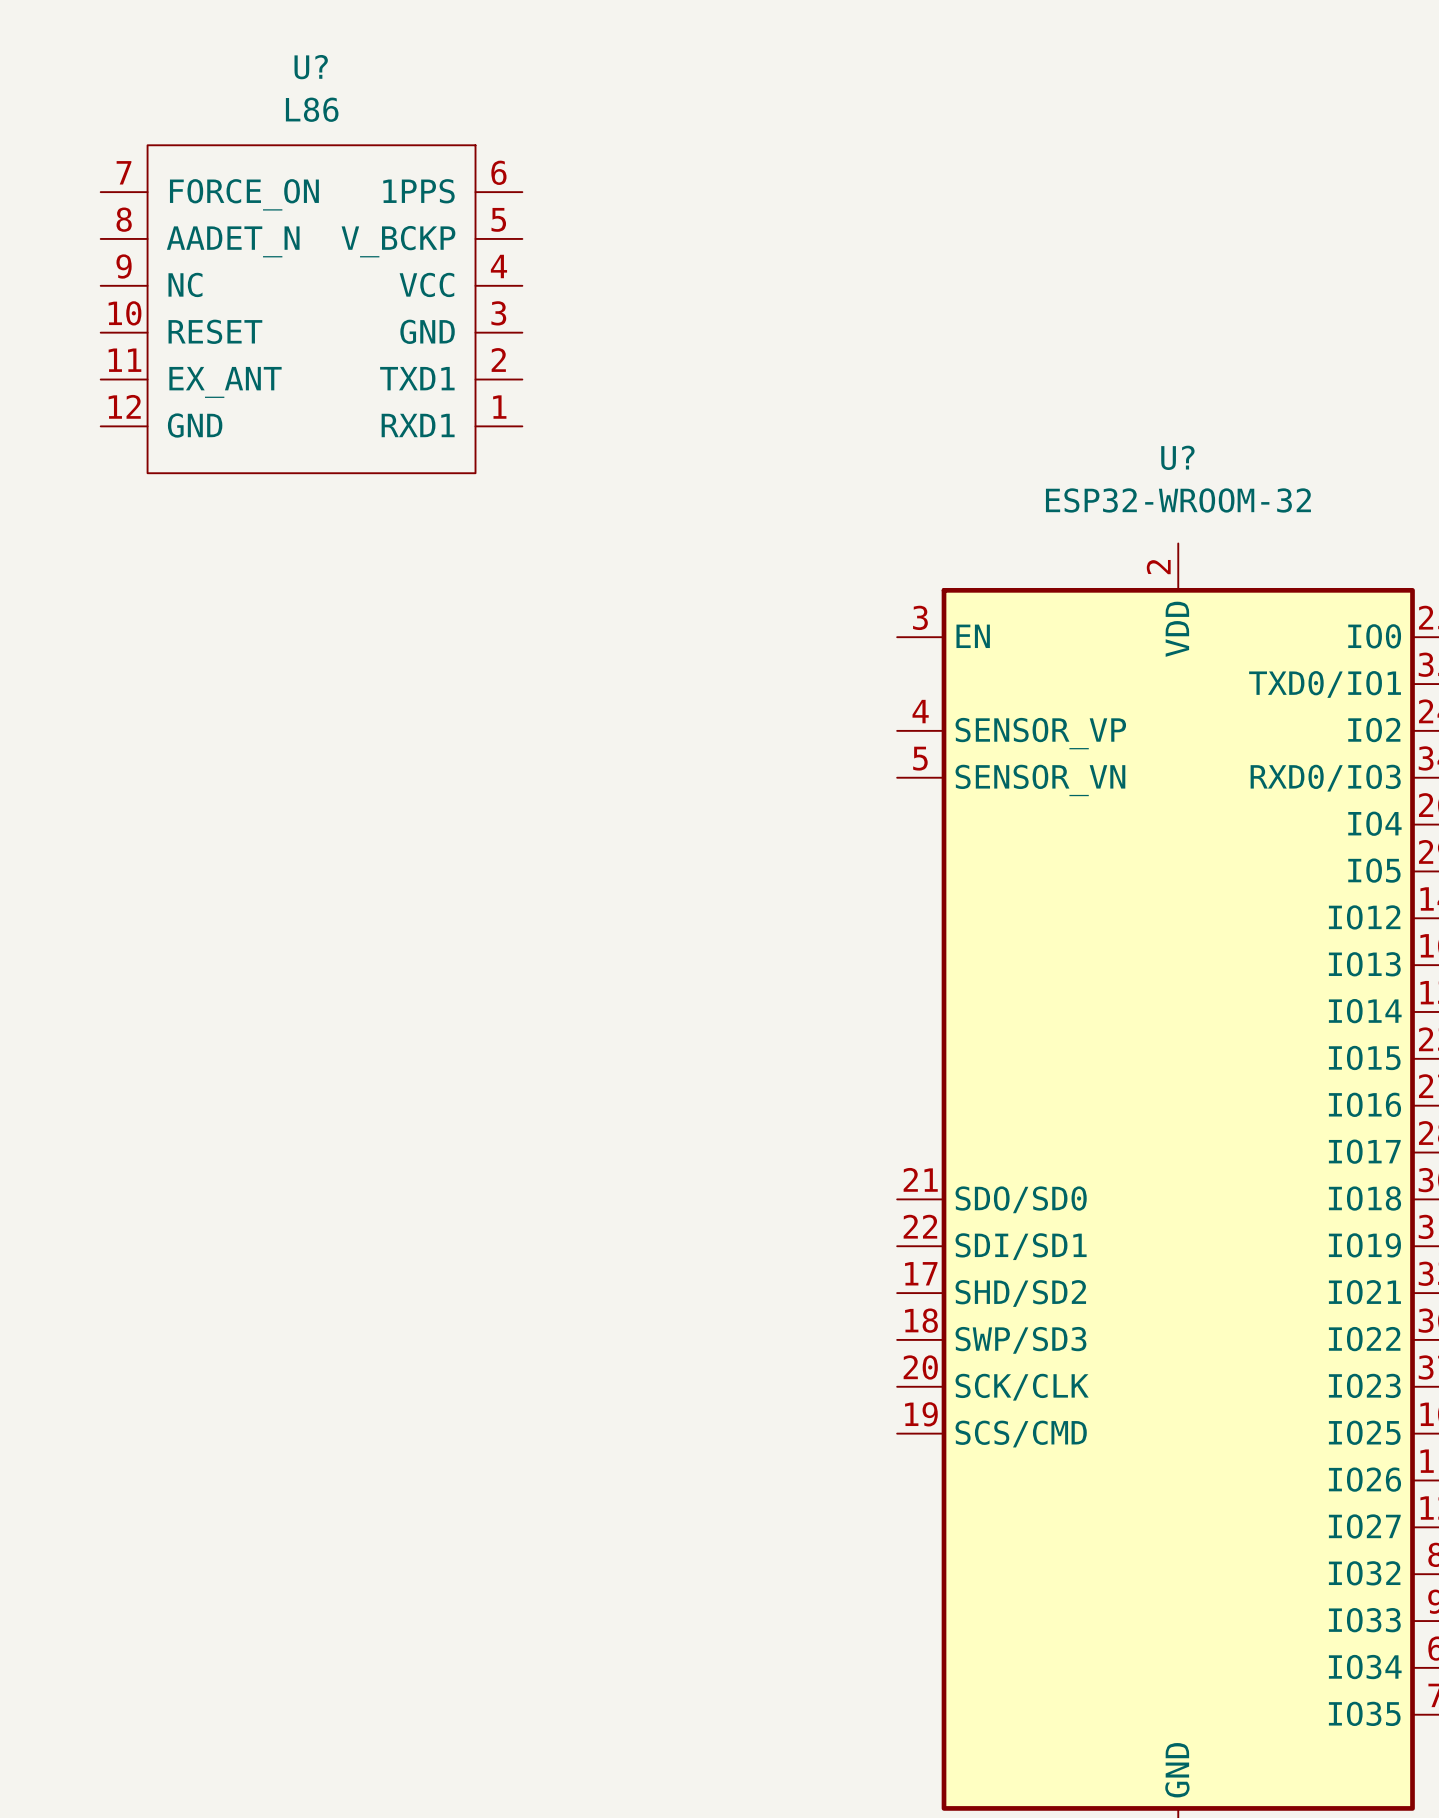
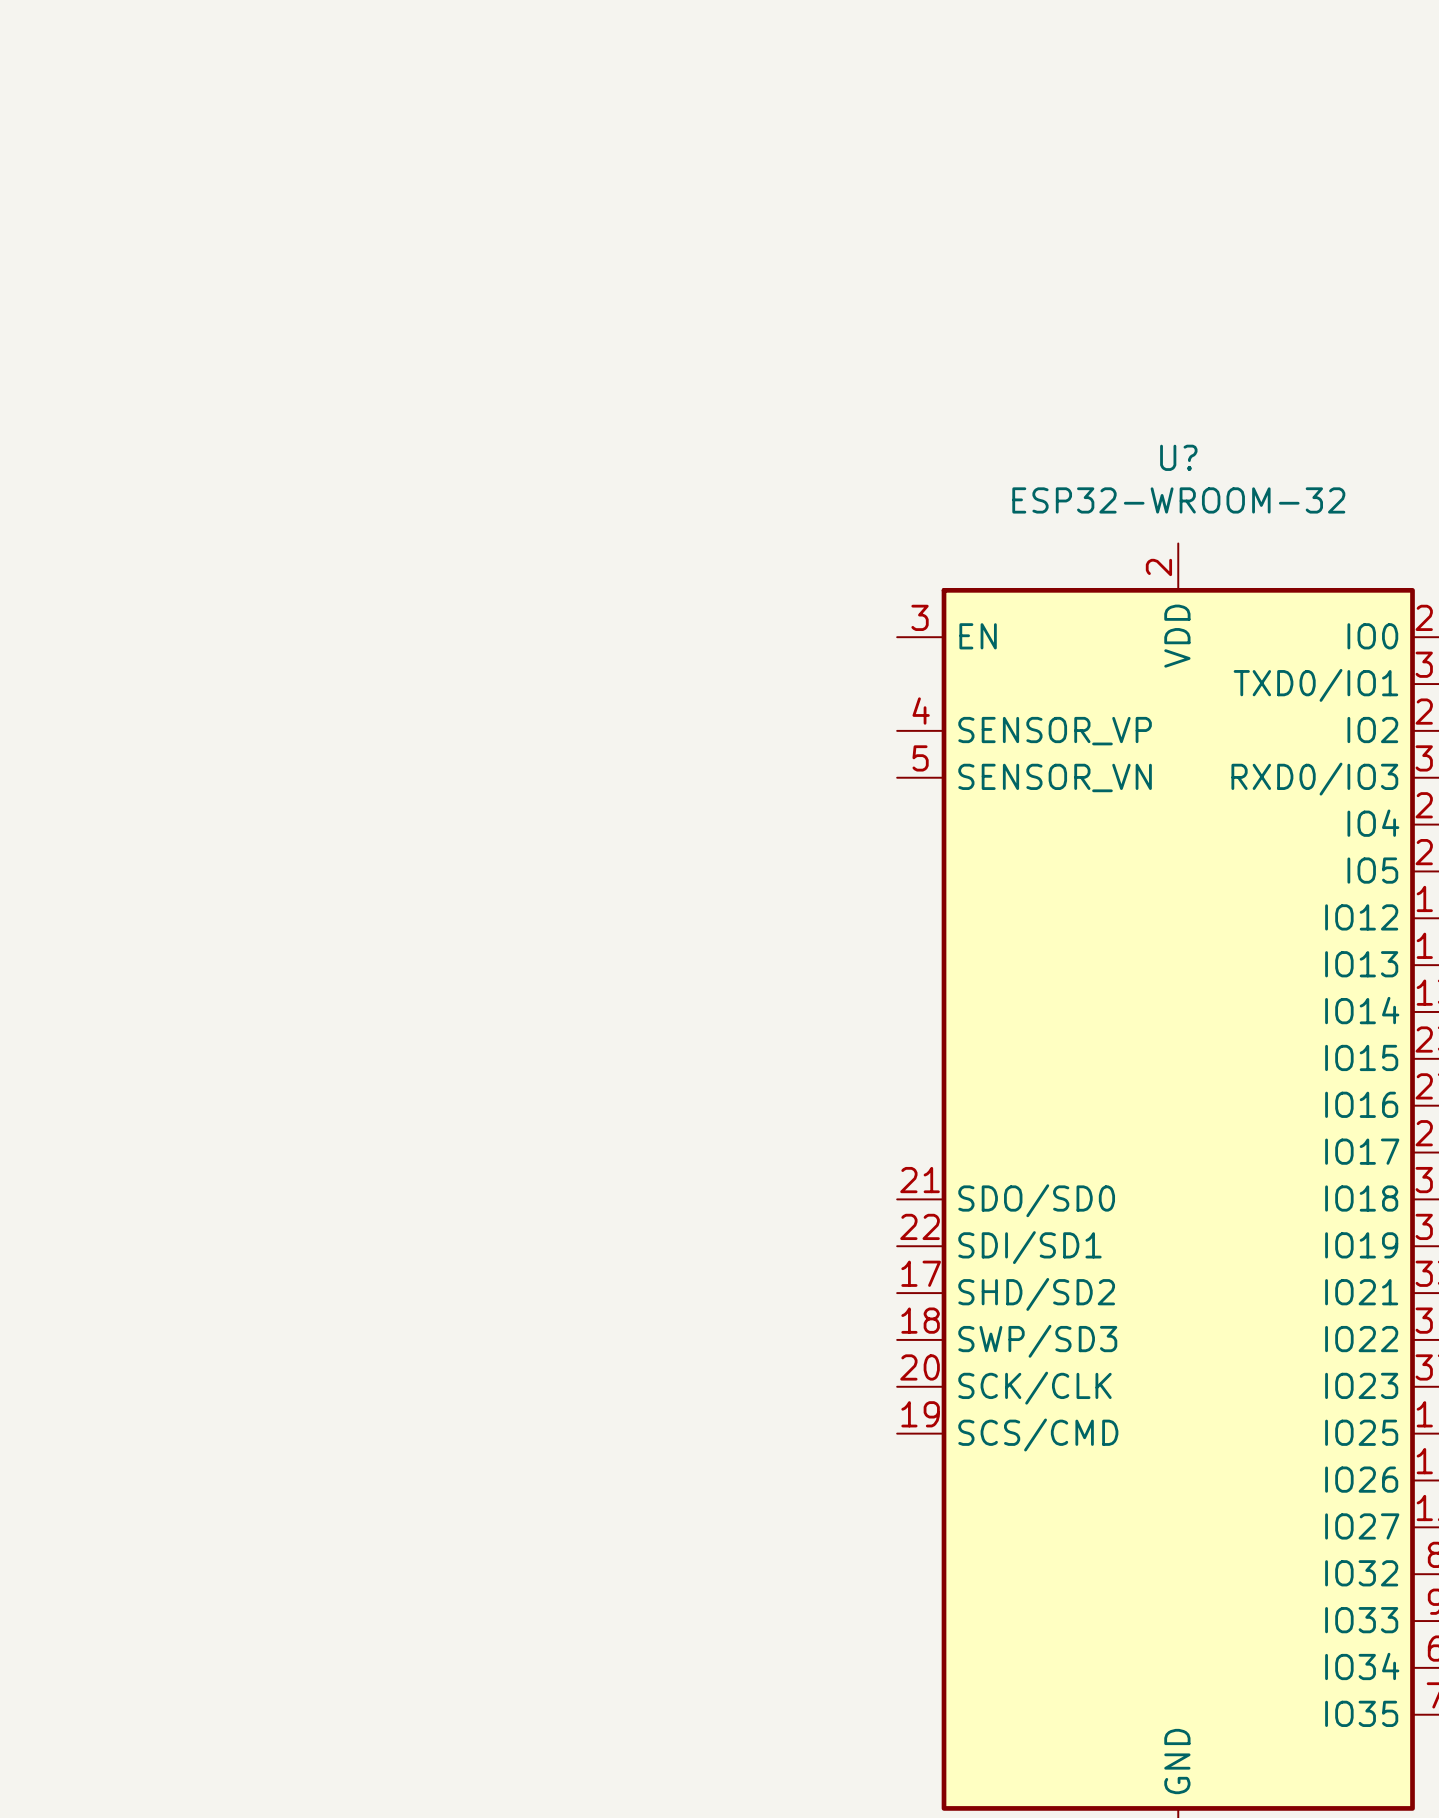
U?: L86 (311, 309) -> none

